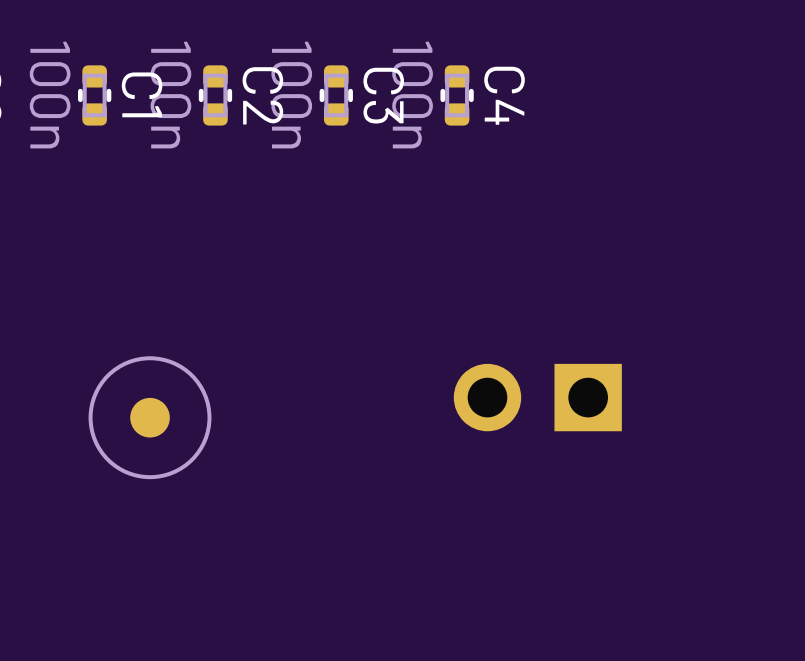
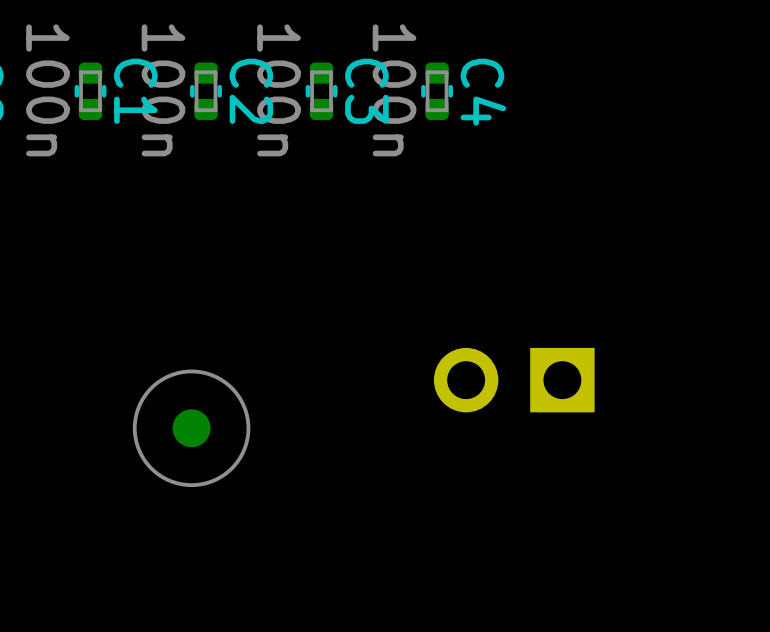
part position: (150, 417) -> (191, 428)

